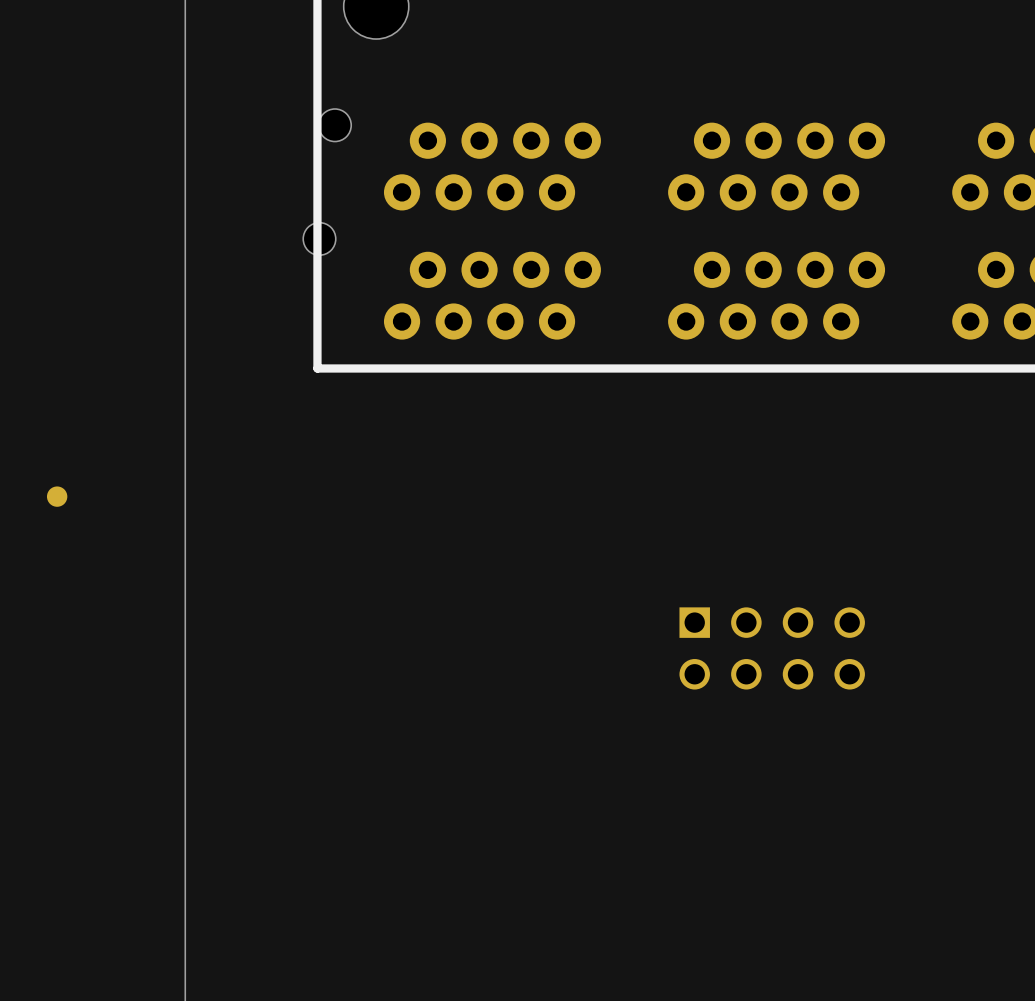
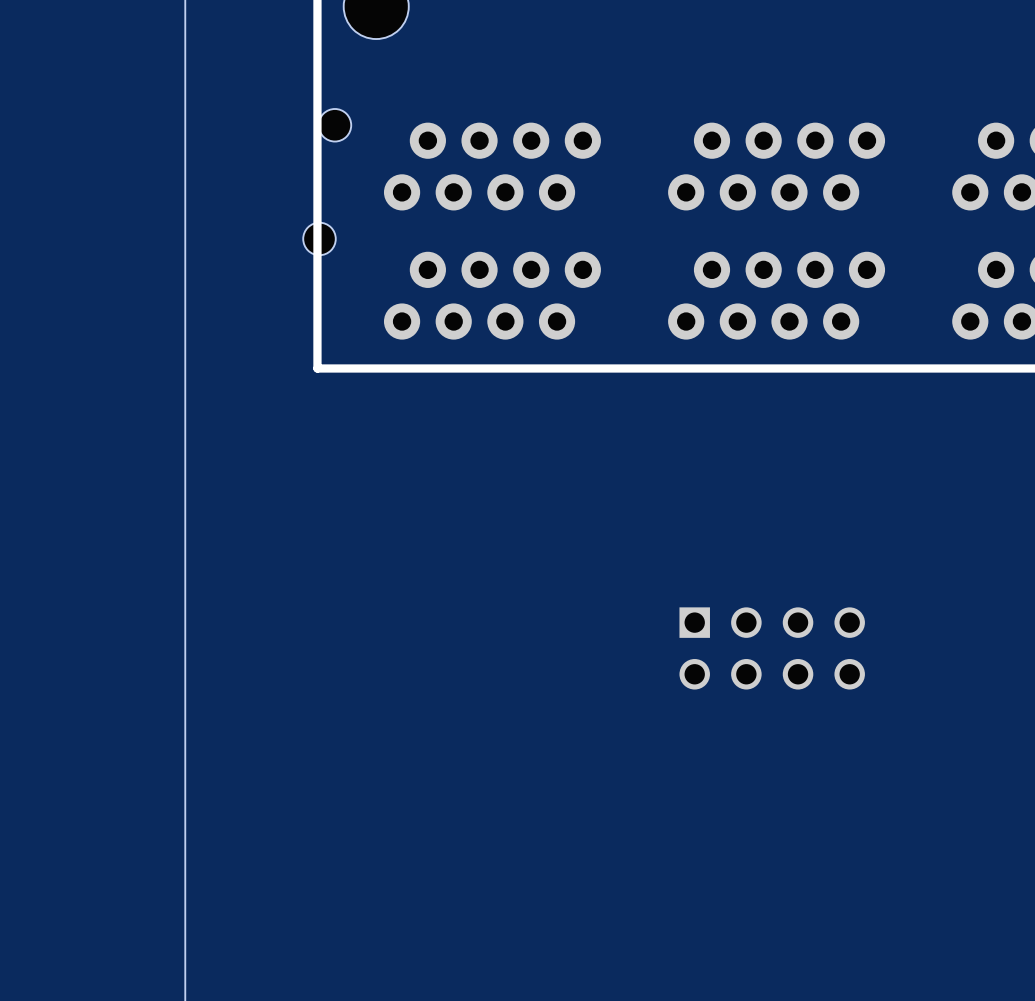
part: (57, 496) -> none

